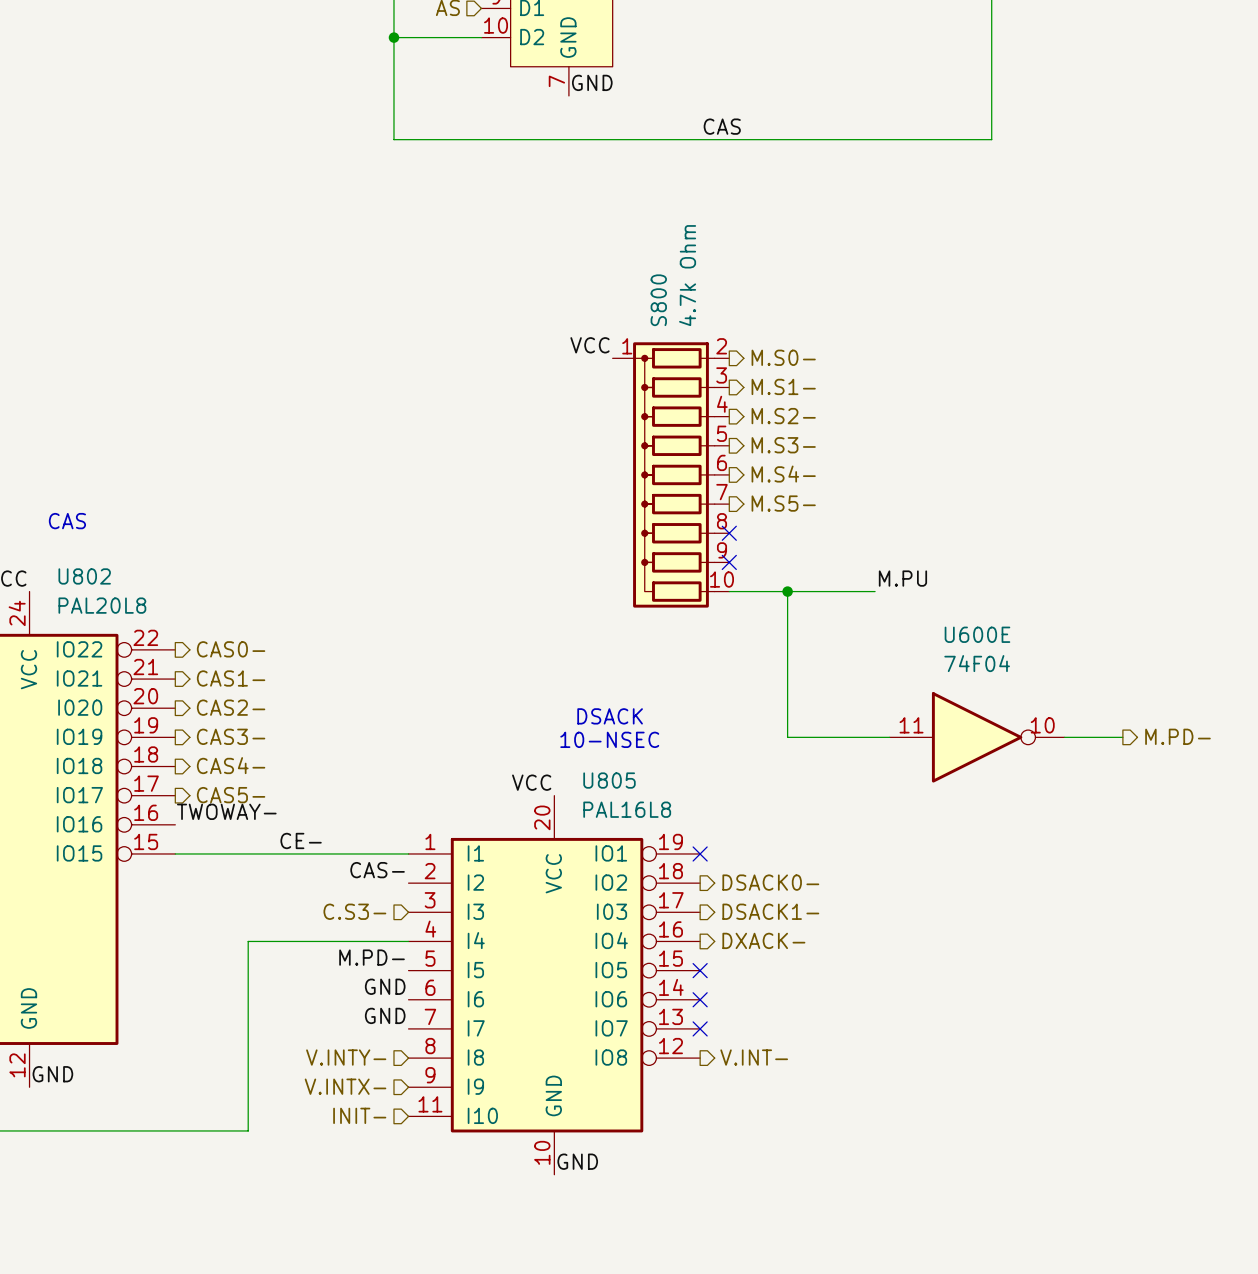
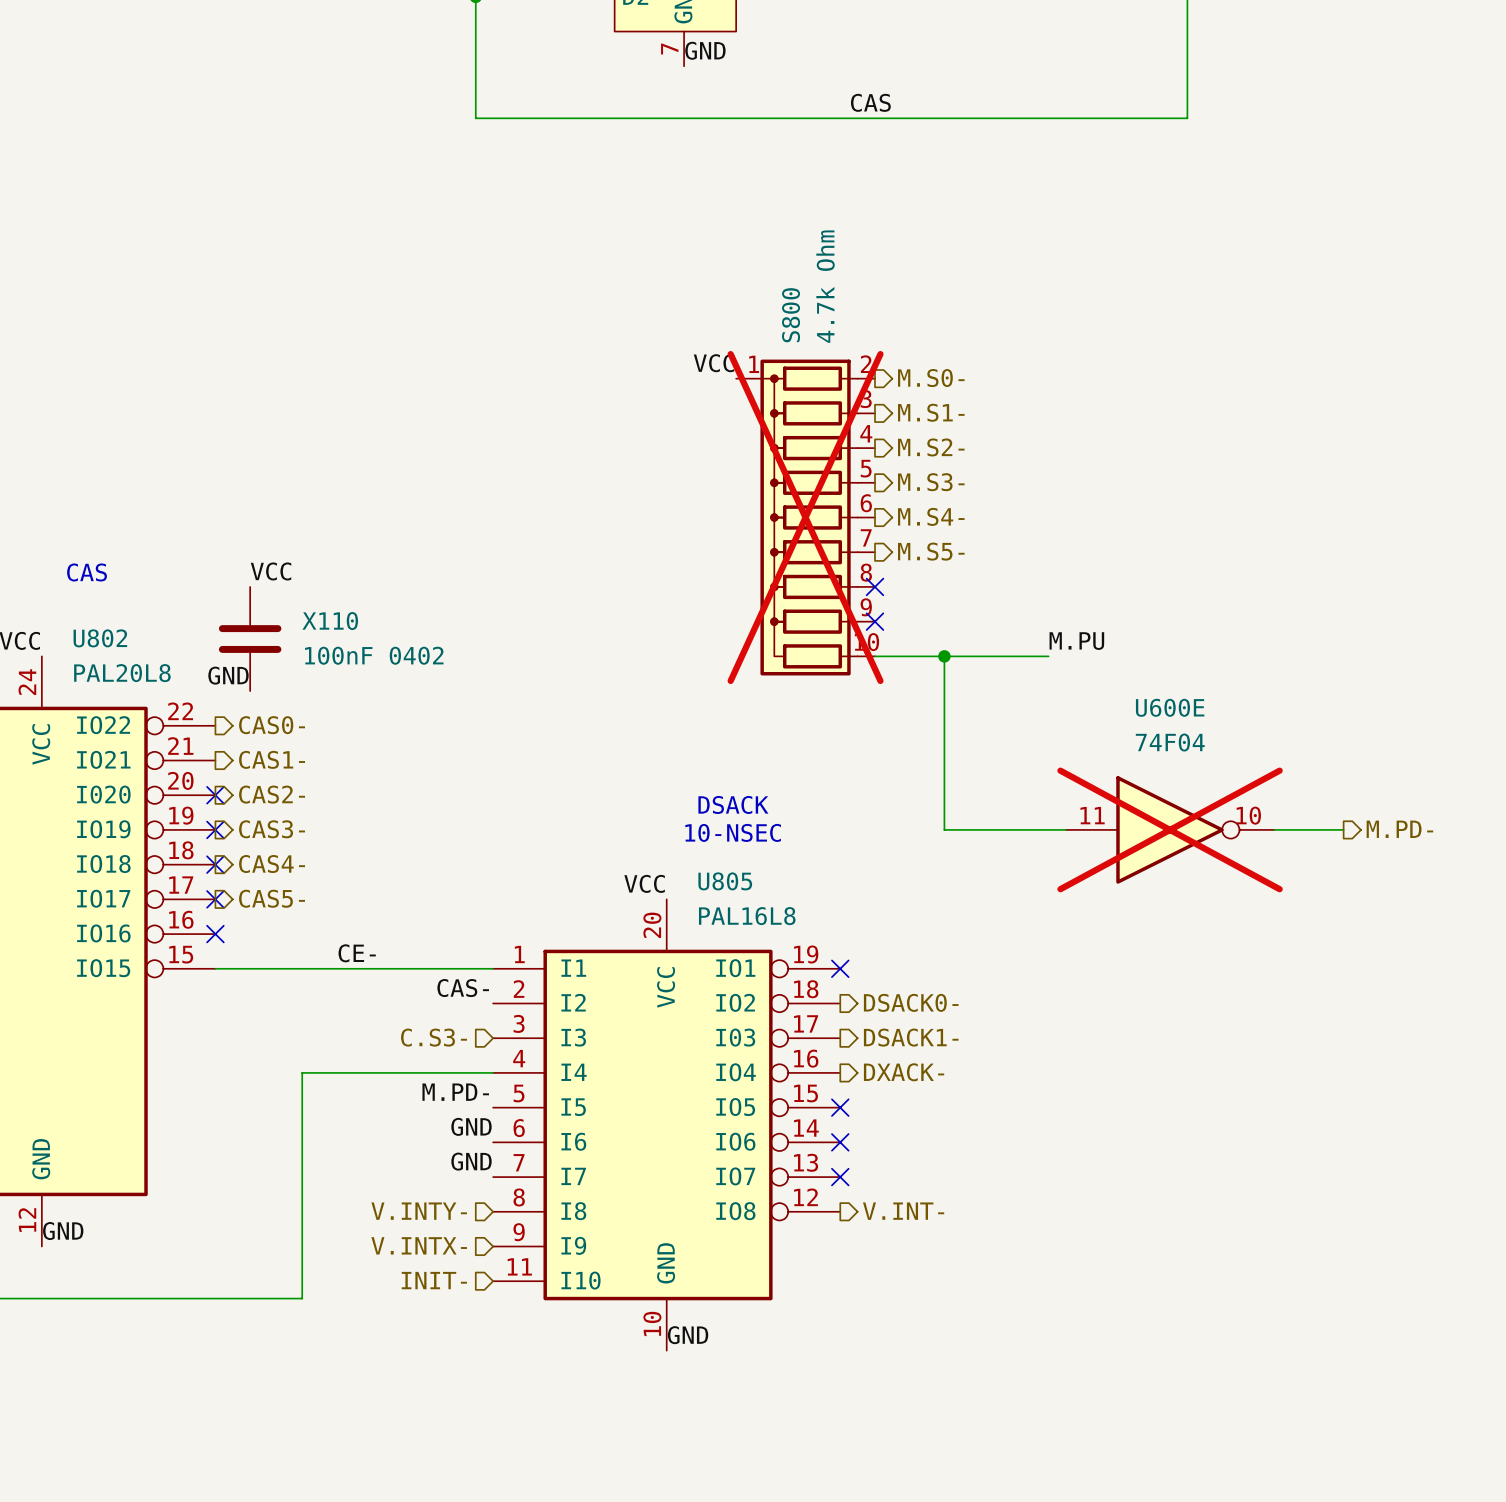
S800 do-not-place cross: none -> (805, 517)
label: none -> VCC (271, 571)
X110: none -> 100nF 0402 (250, 639)
label: none -> GND (228, 675)
no-connect mark: none -> (215, 795)
no-connect mark: none -> (215, 829)
U600E do-not-place cross: none -> (1170, 829)
no-connect mark: none -> (215, 864)
no-connect mark: none -> (215, 899)
label: TWOWAY- (226, 811) -> none
no-connect mark: none -> (215, 934)

